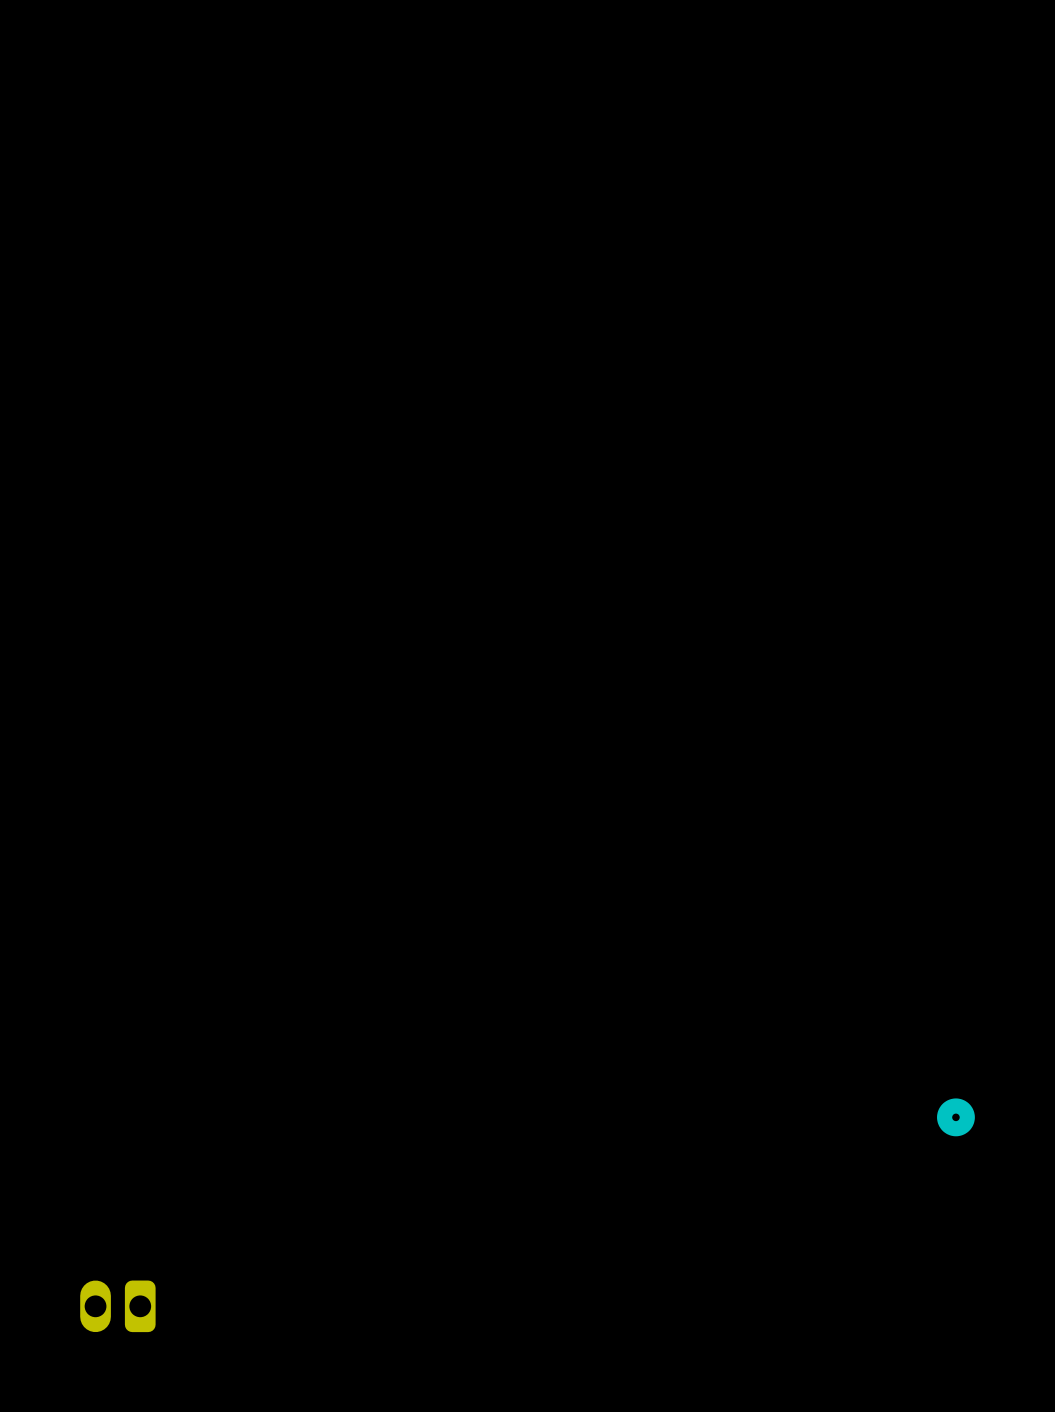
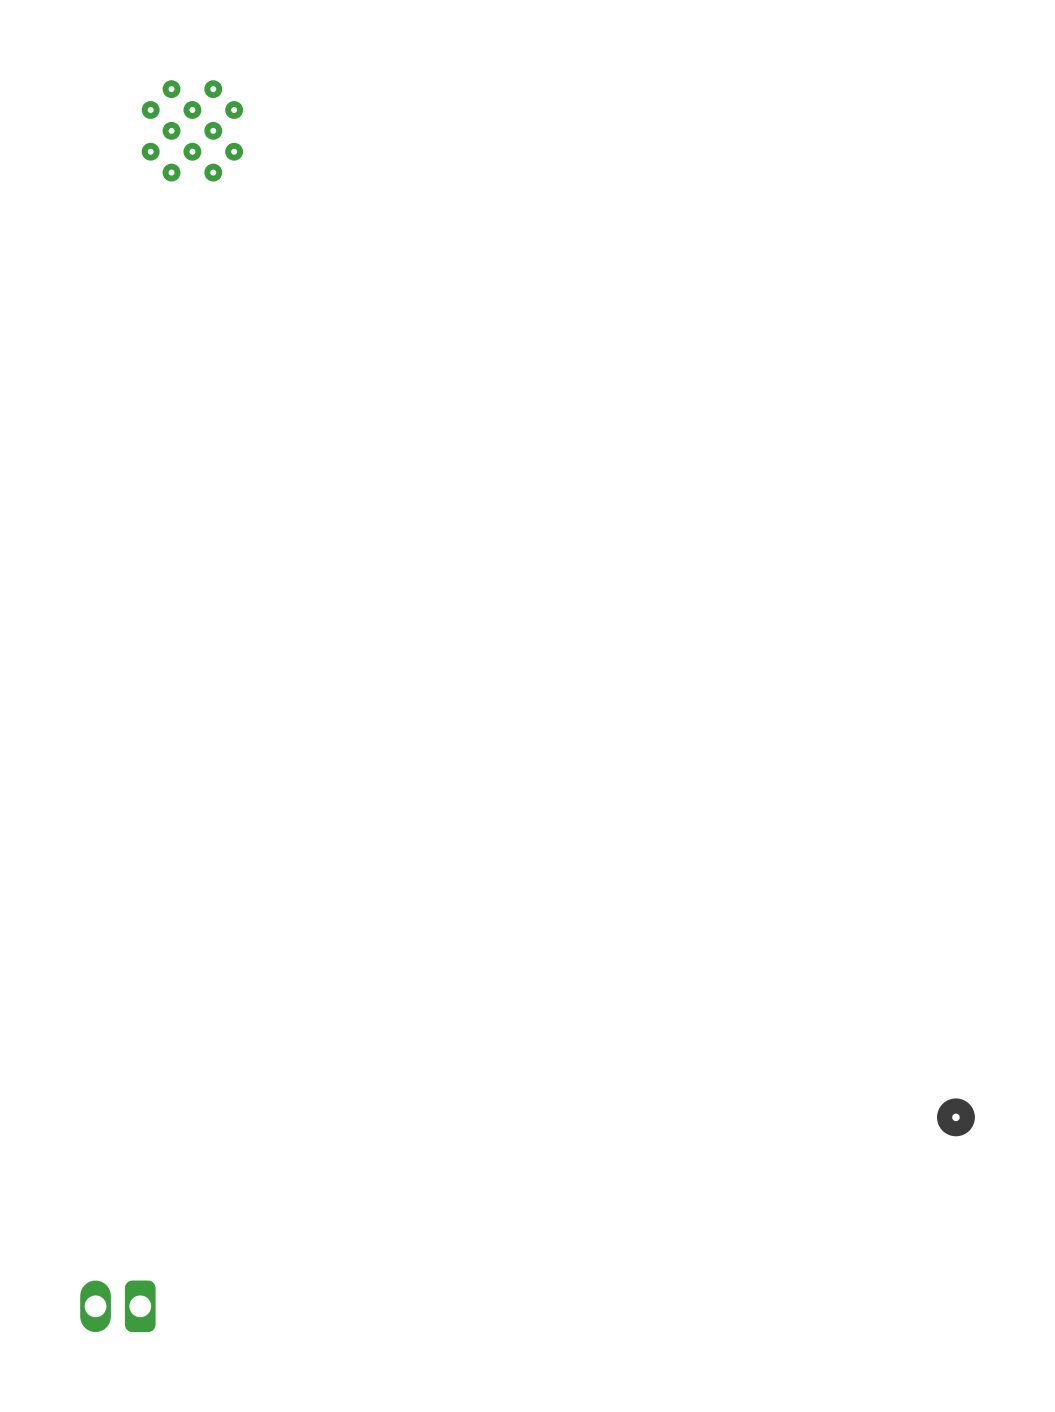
part: none -> (192, 130)

